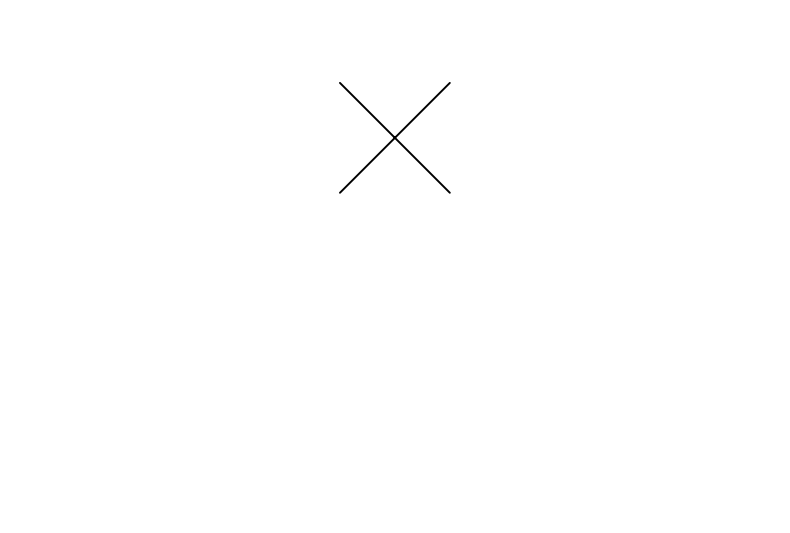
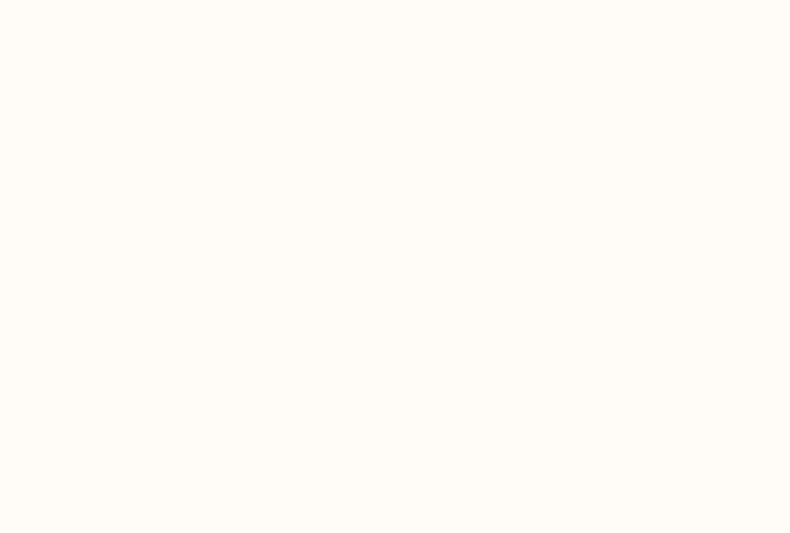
no-connect mark: (394, 137) -> none

